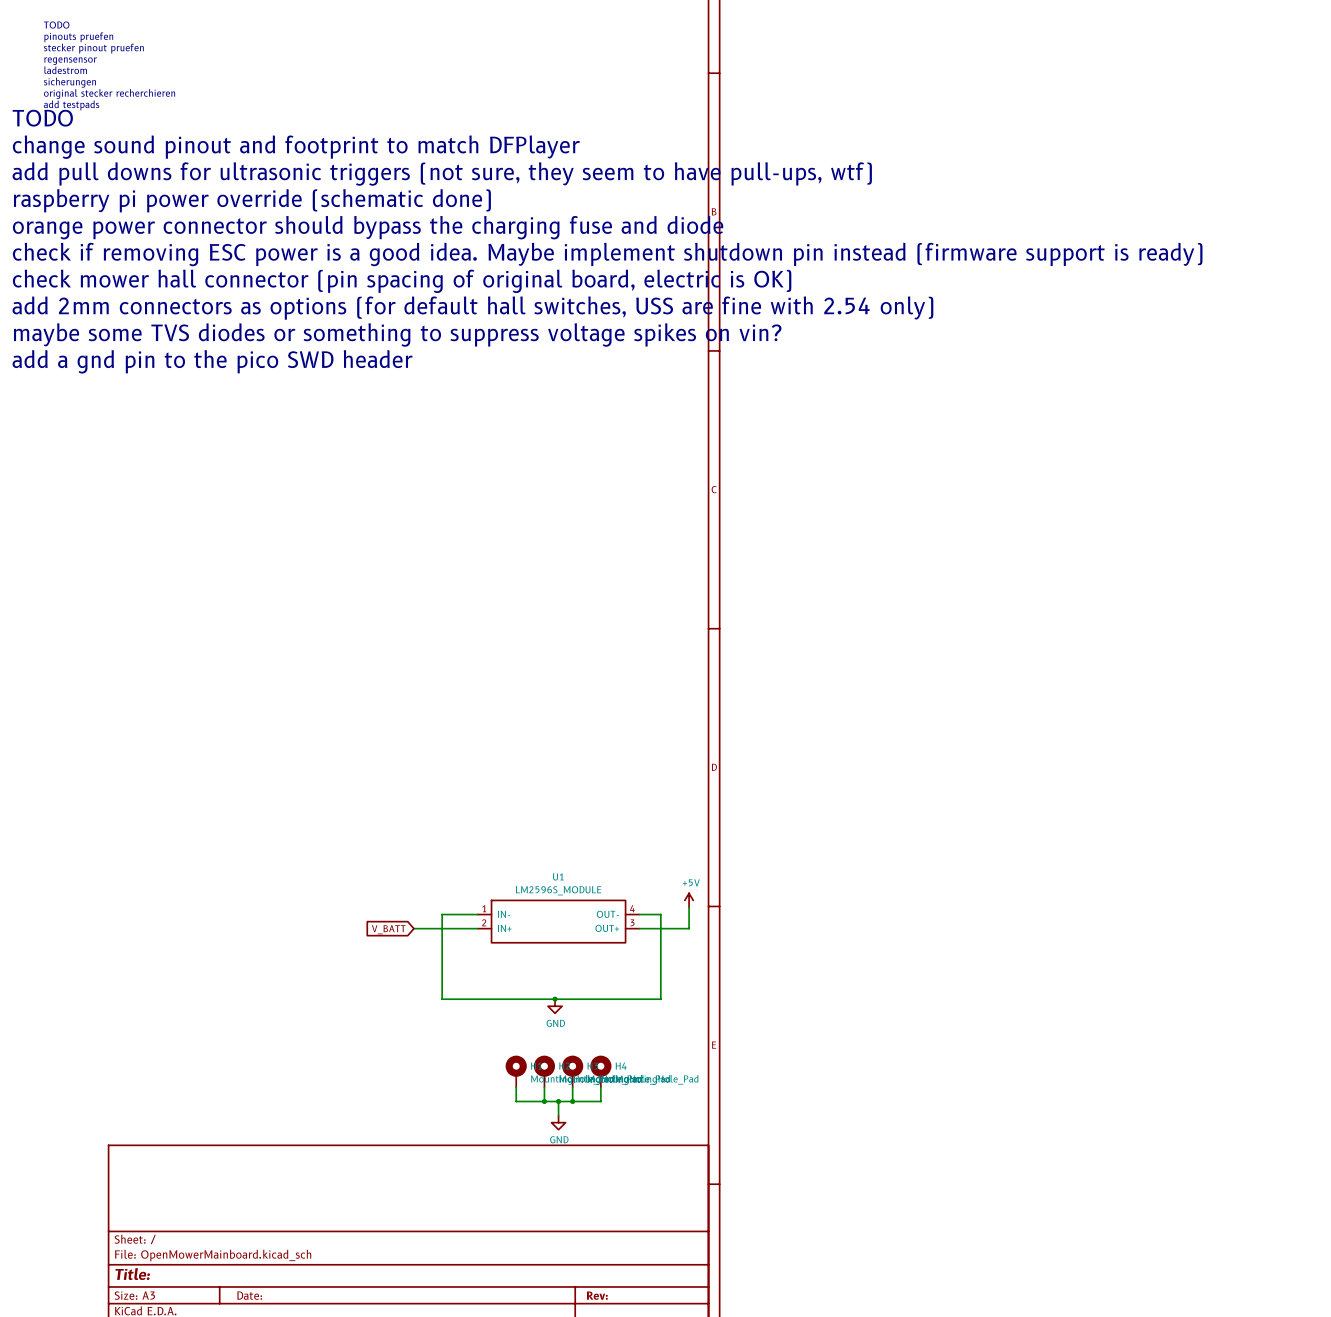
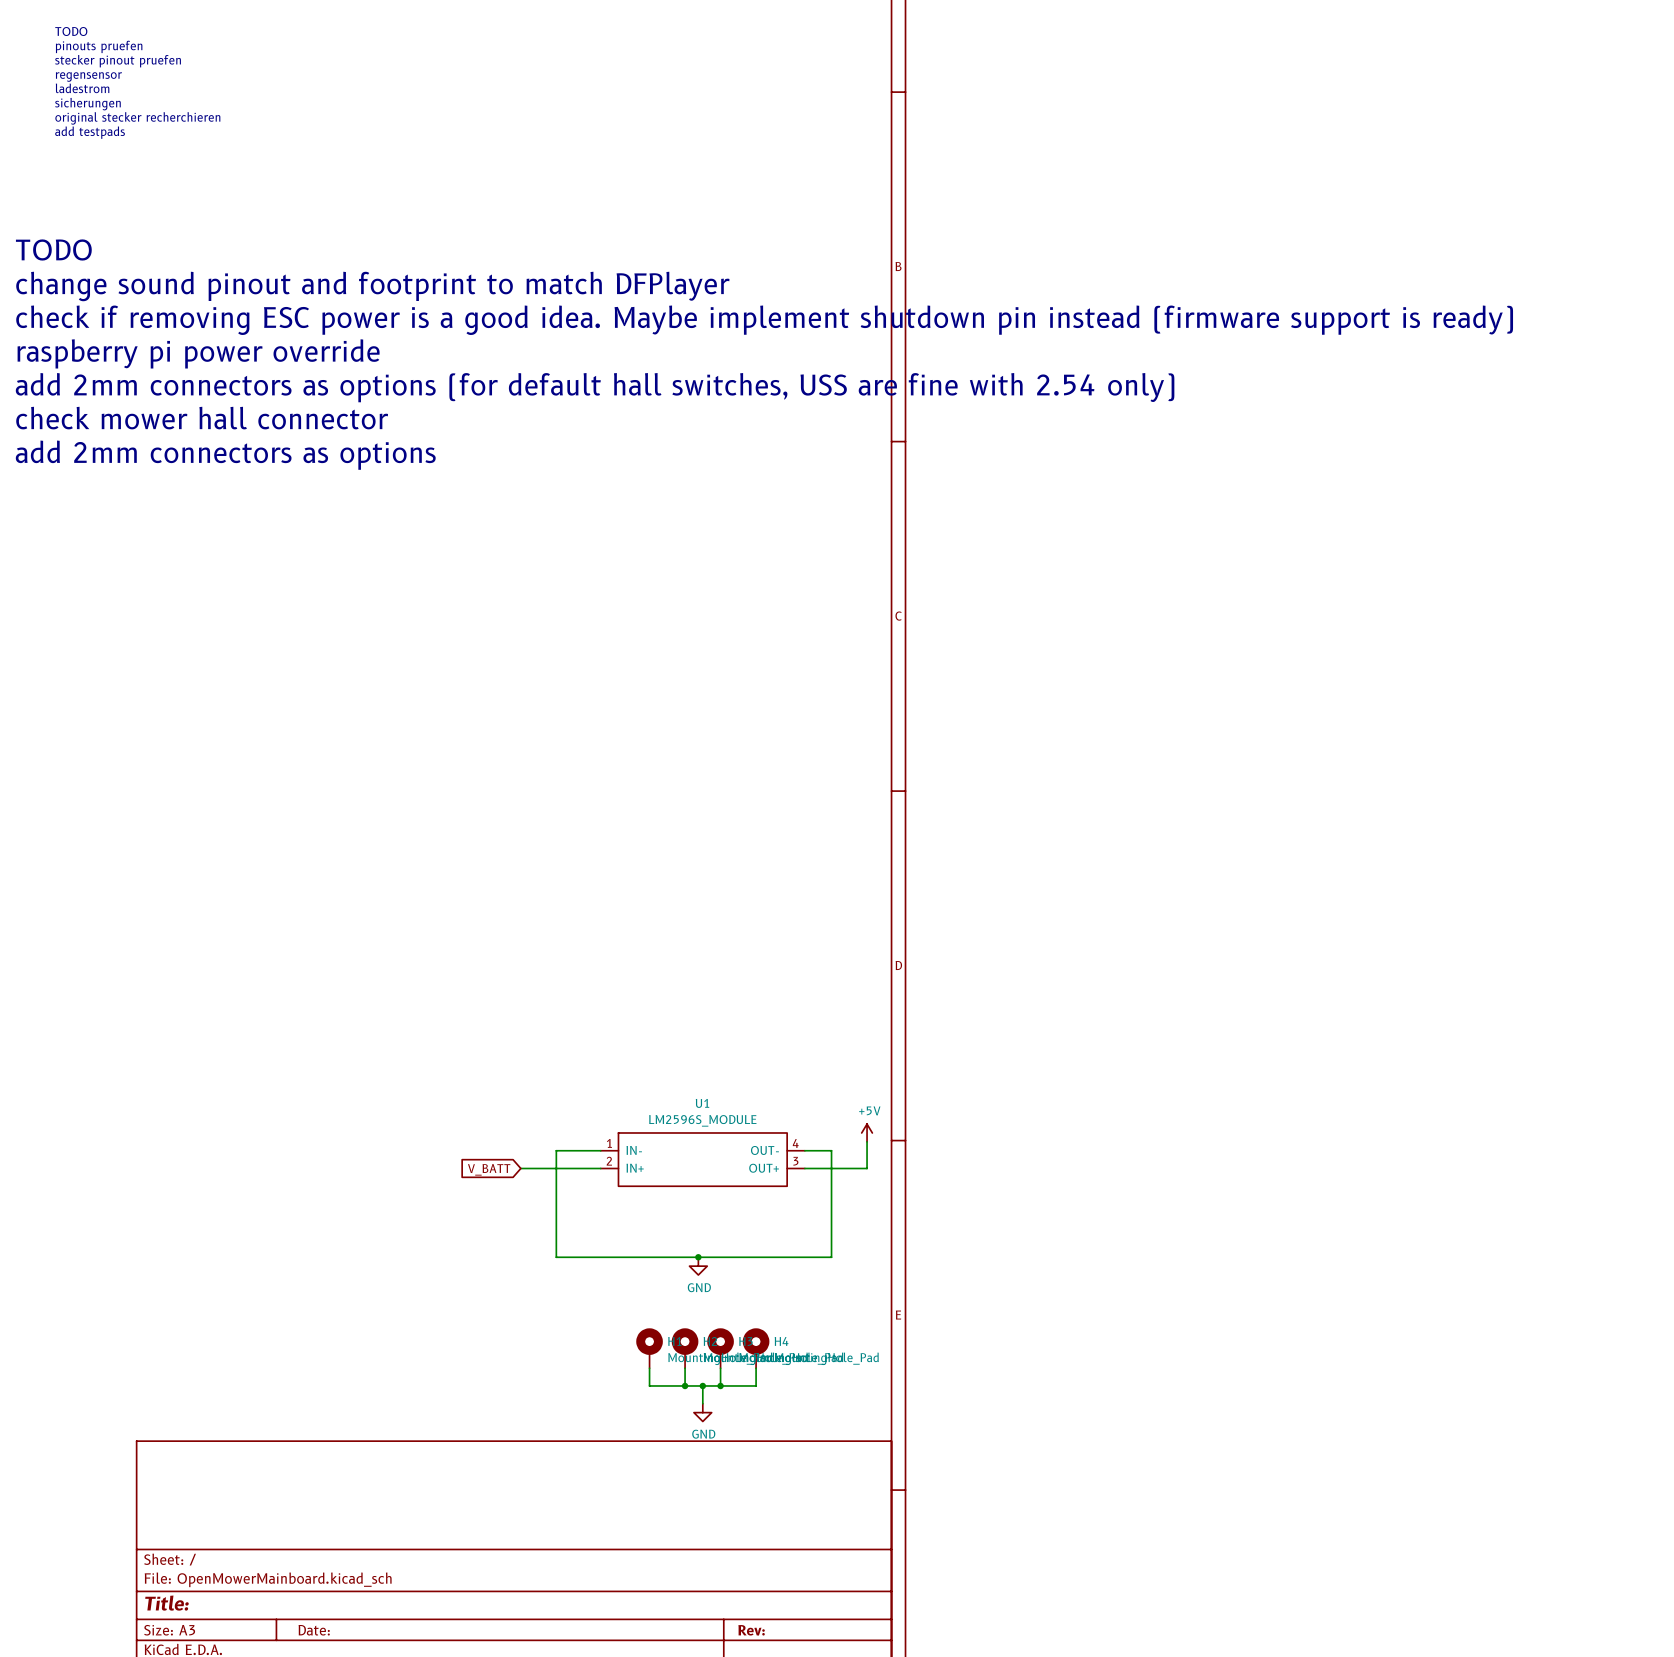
text: TODO (42, 118) -> none
text: change sound pinout and footprint to match DFPlayer (296, 147) -> none
text: add pull downs for ultrasonic triggers (not sure, they seem to have pull-ups, wtf) (442, 174) -> none
text: raspberry pi power override (schematic done) (252, 200) -> TODO (53, 249)
text: orange power connector should bypass the charging fuse and diode (368, 227) -> change sound pinout and footprint to match DFPlayer (372, 286)
text: check mower hall connector (pin spacing of original board, electric is OK) (402, 281) -> raspberry pi power override (198, 353)
text: maybe some TVS diodes or something to suppress voltage spikes on vin? (397, 335) -> check mower hall connector (202, 418)
text: add a gnd pin to the pico SWD header (212, 361) -> add 2mm connectors as options (225, 455)

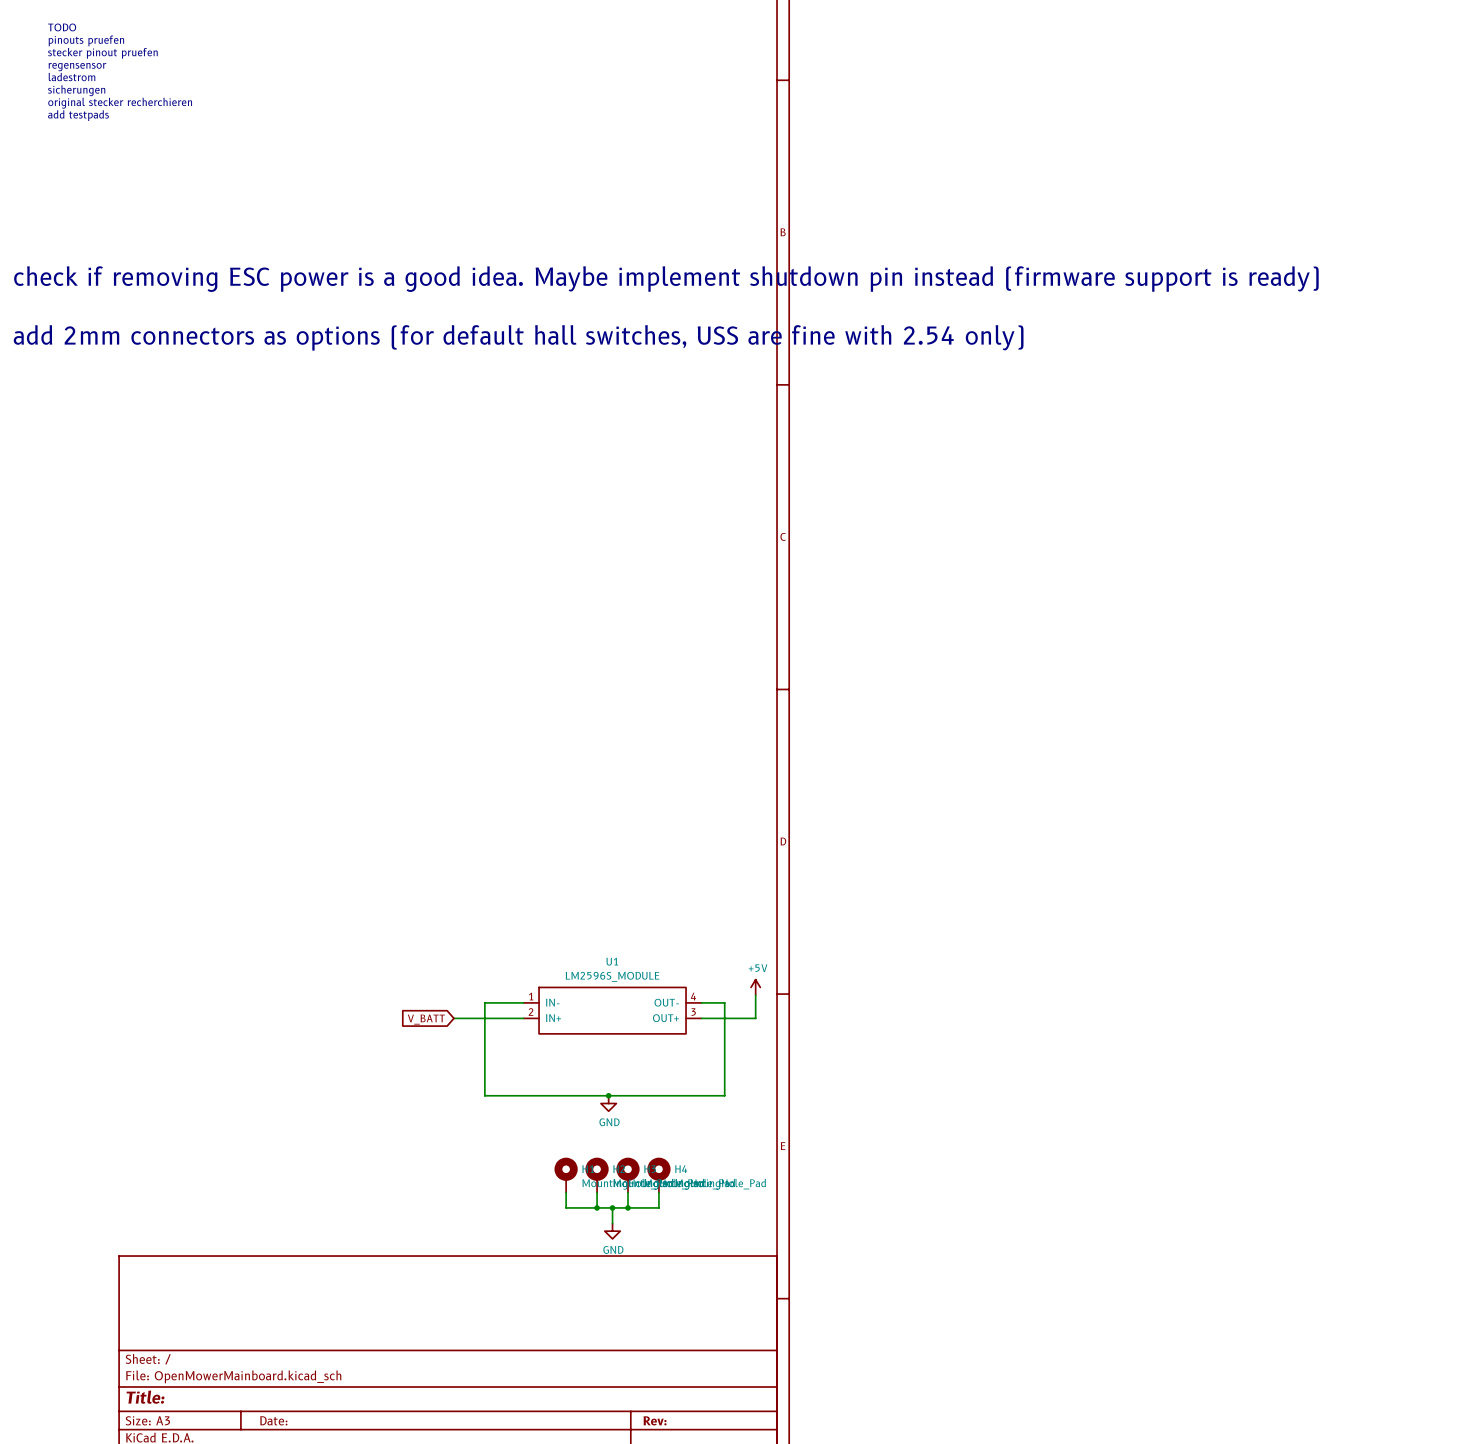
text: TODO (53, 249) -> none
text: change sound pinout and footprint to match DFPlayer (372, 286) -> none
text: raspberry pi power override (198, 353) -> none
text: check mower hall connector (202, 418) -> none
text: add 2mm connectors as options (225, 455) -> none

